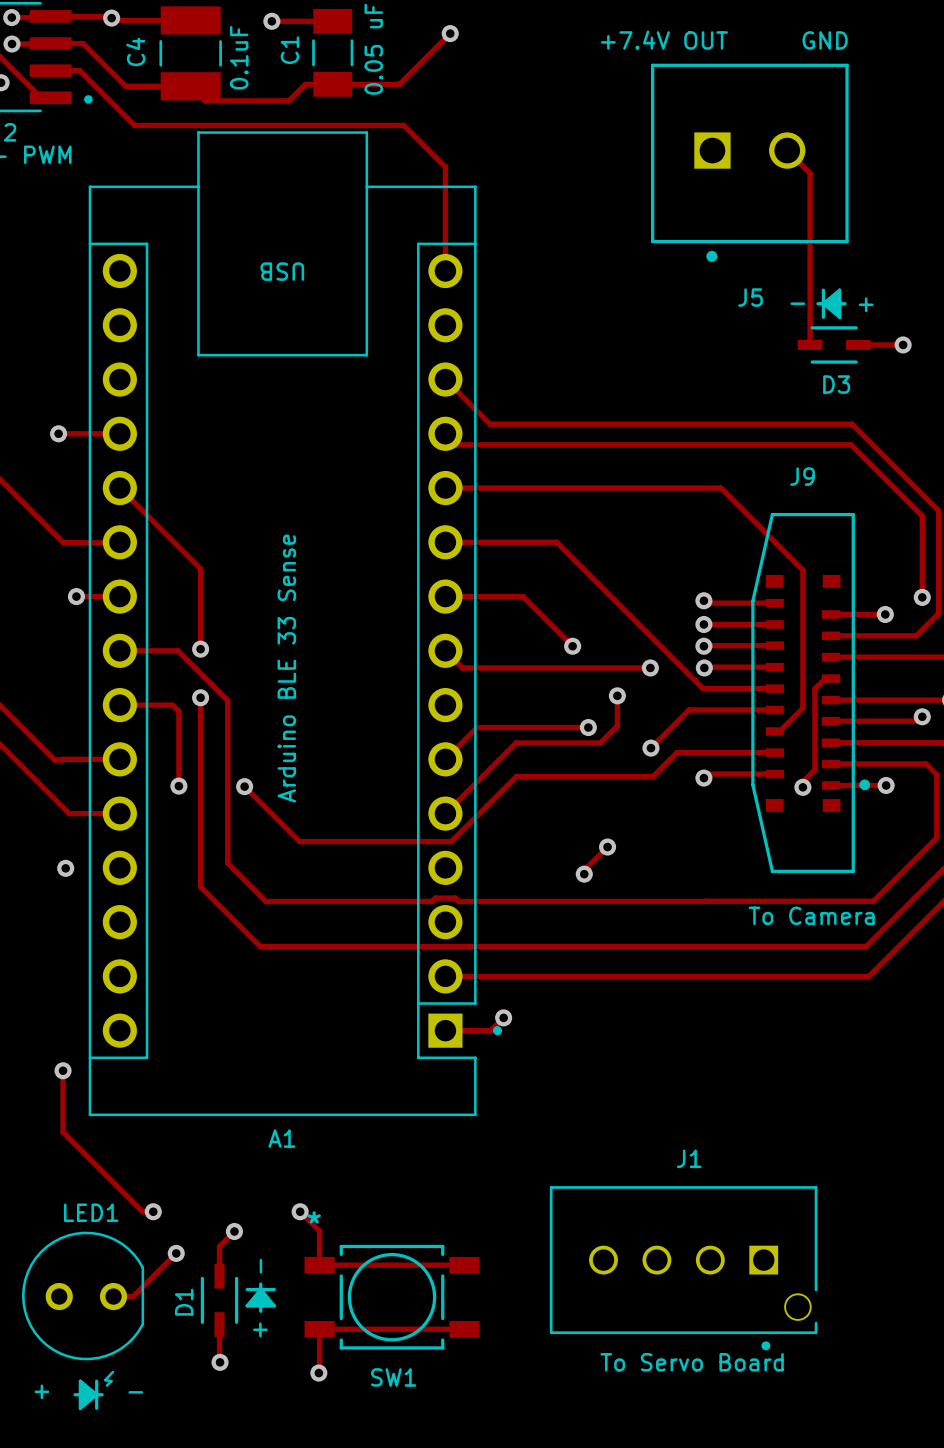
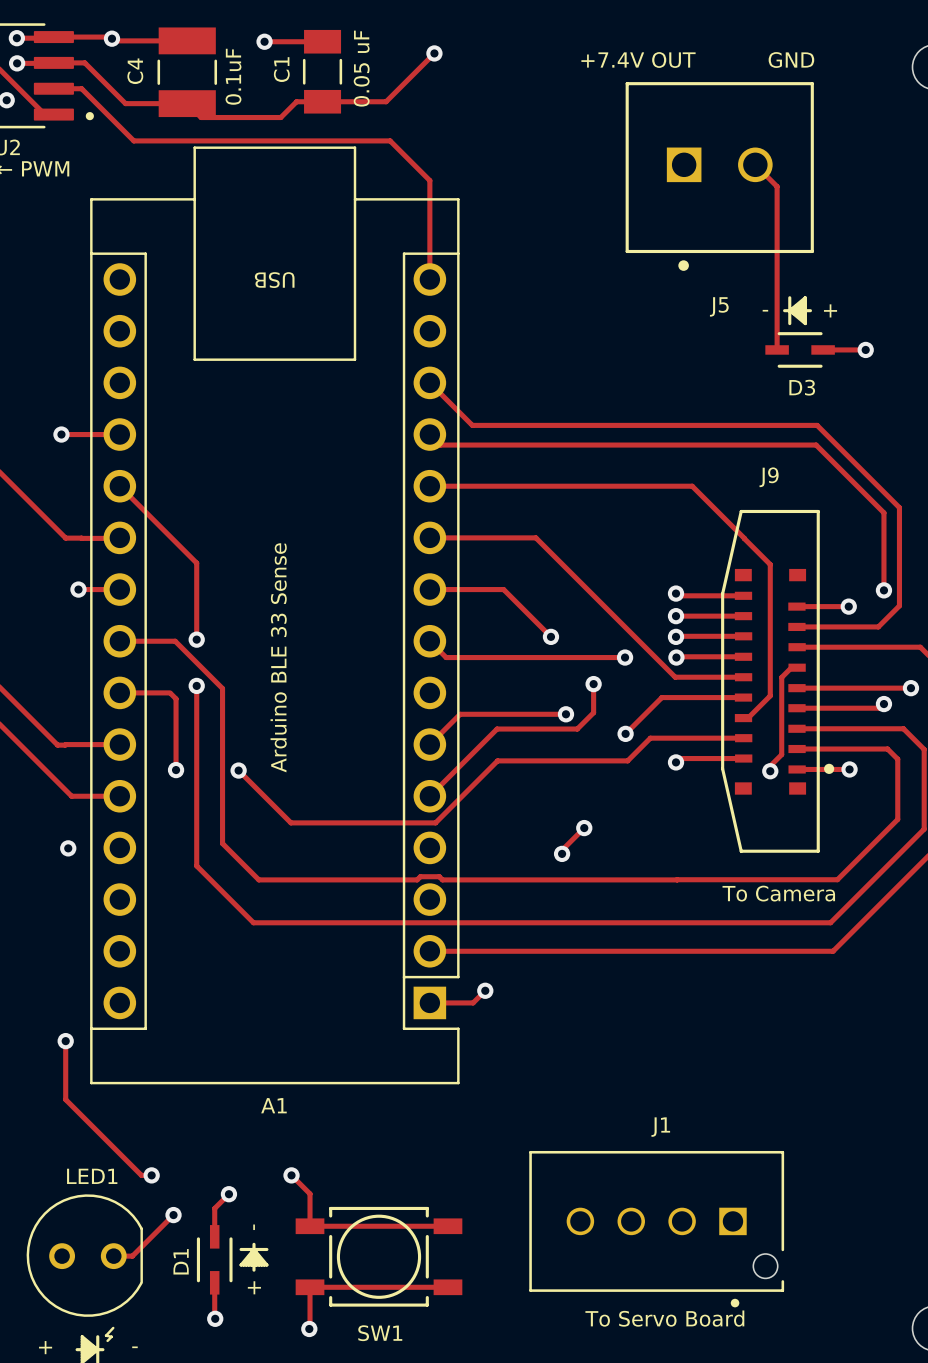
A1 footprint: [88, 131, 503, 1117] -> [90, 146, 460, 1085]
SW1 text: * (314, 1217) -> none

